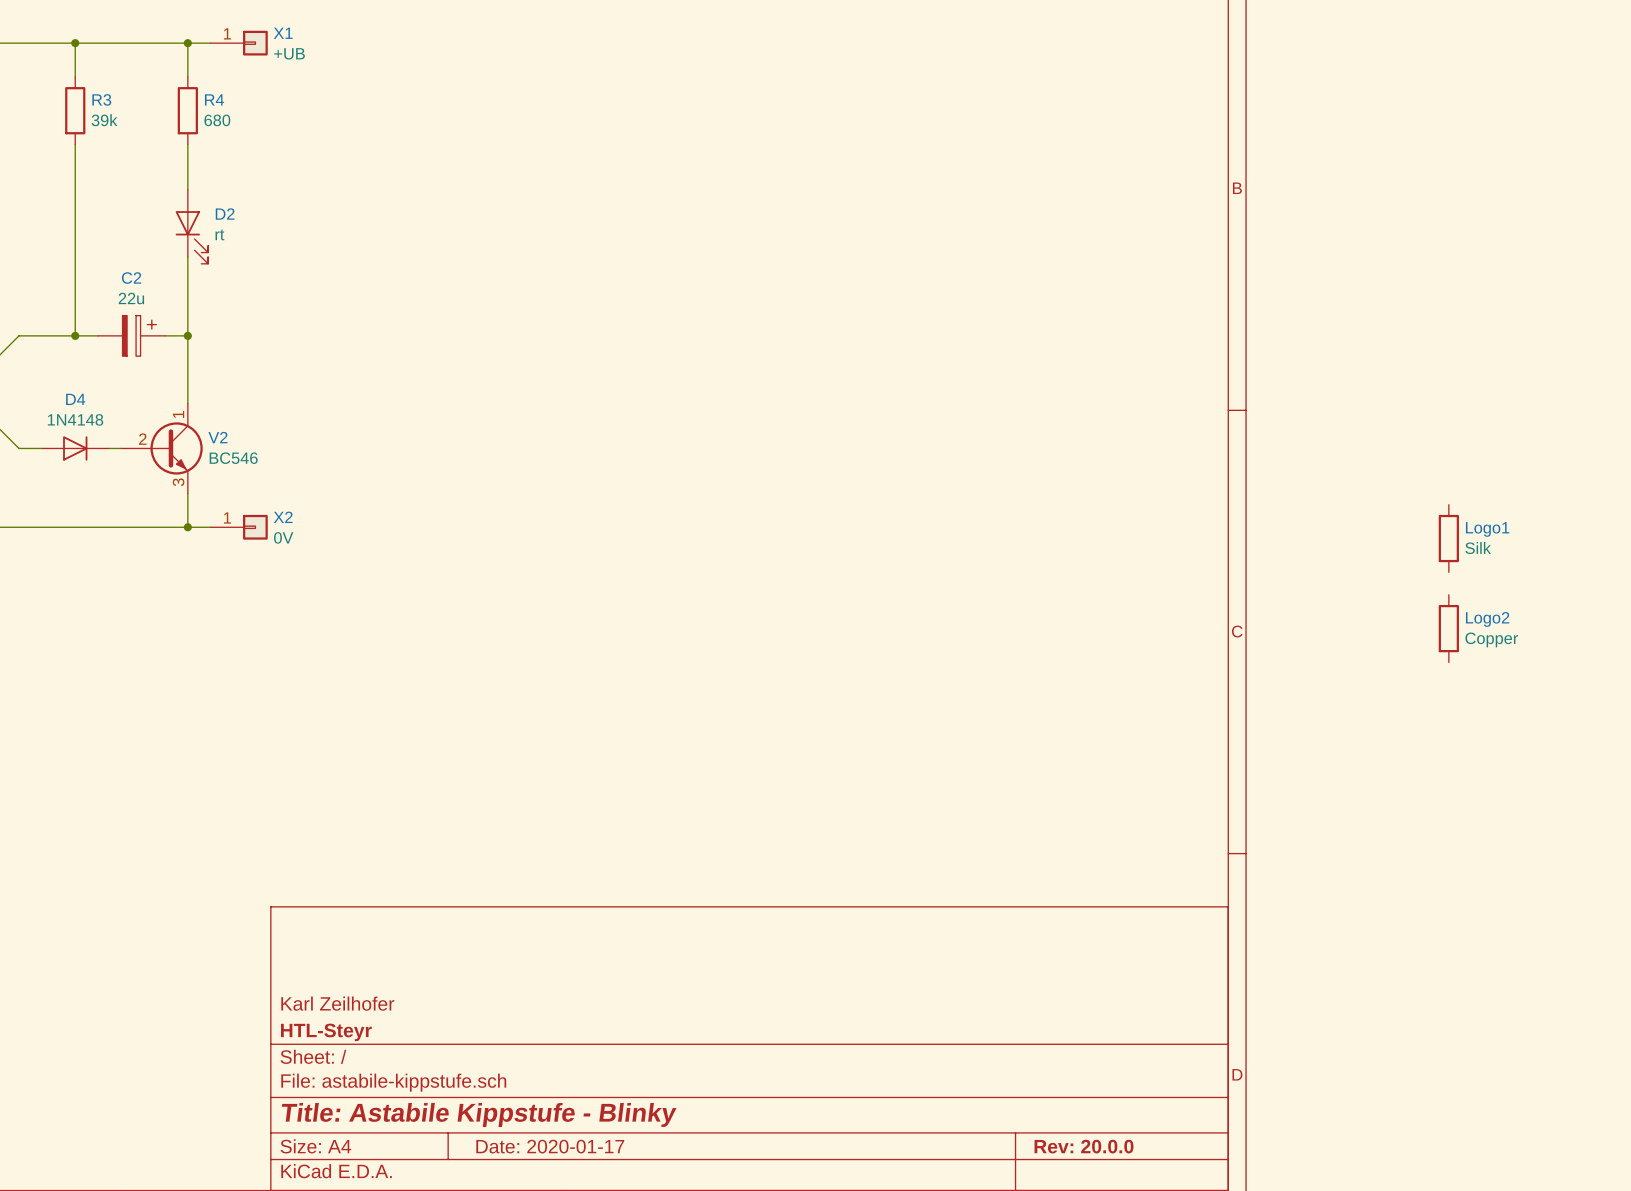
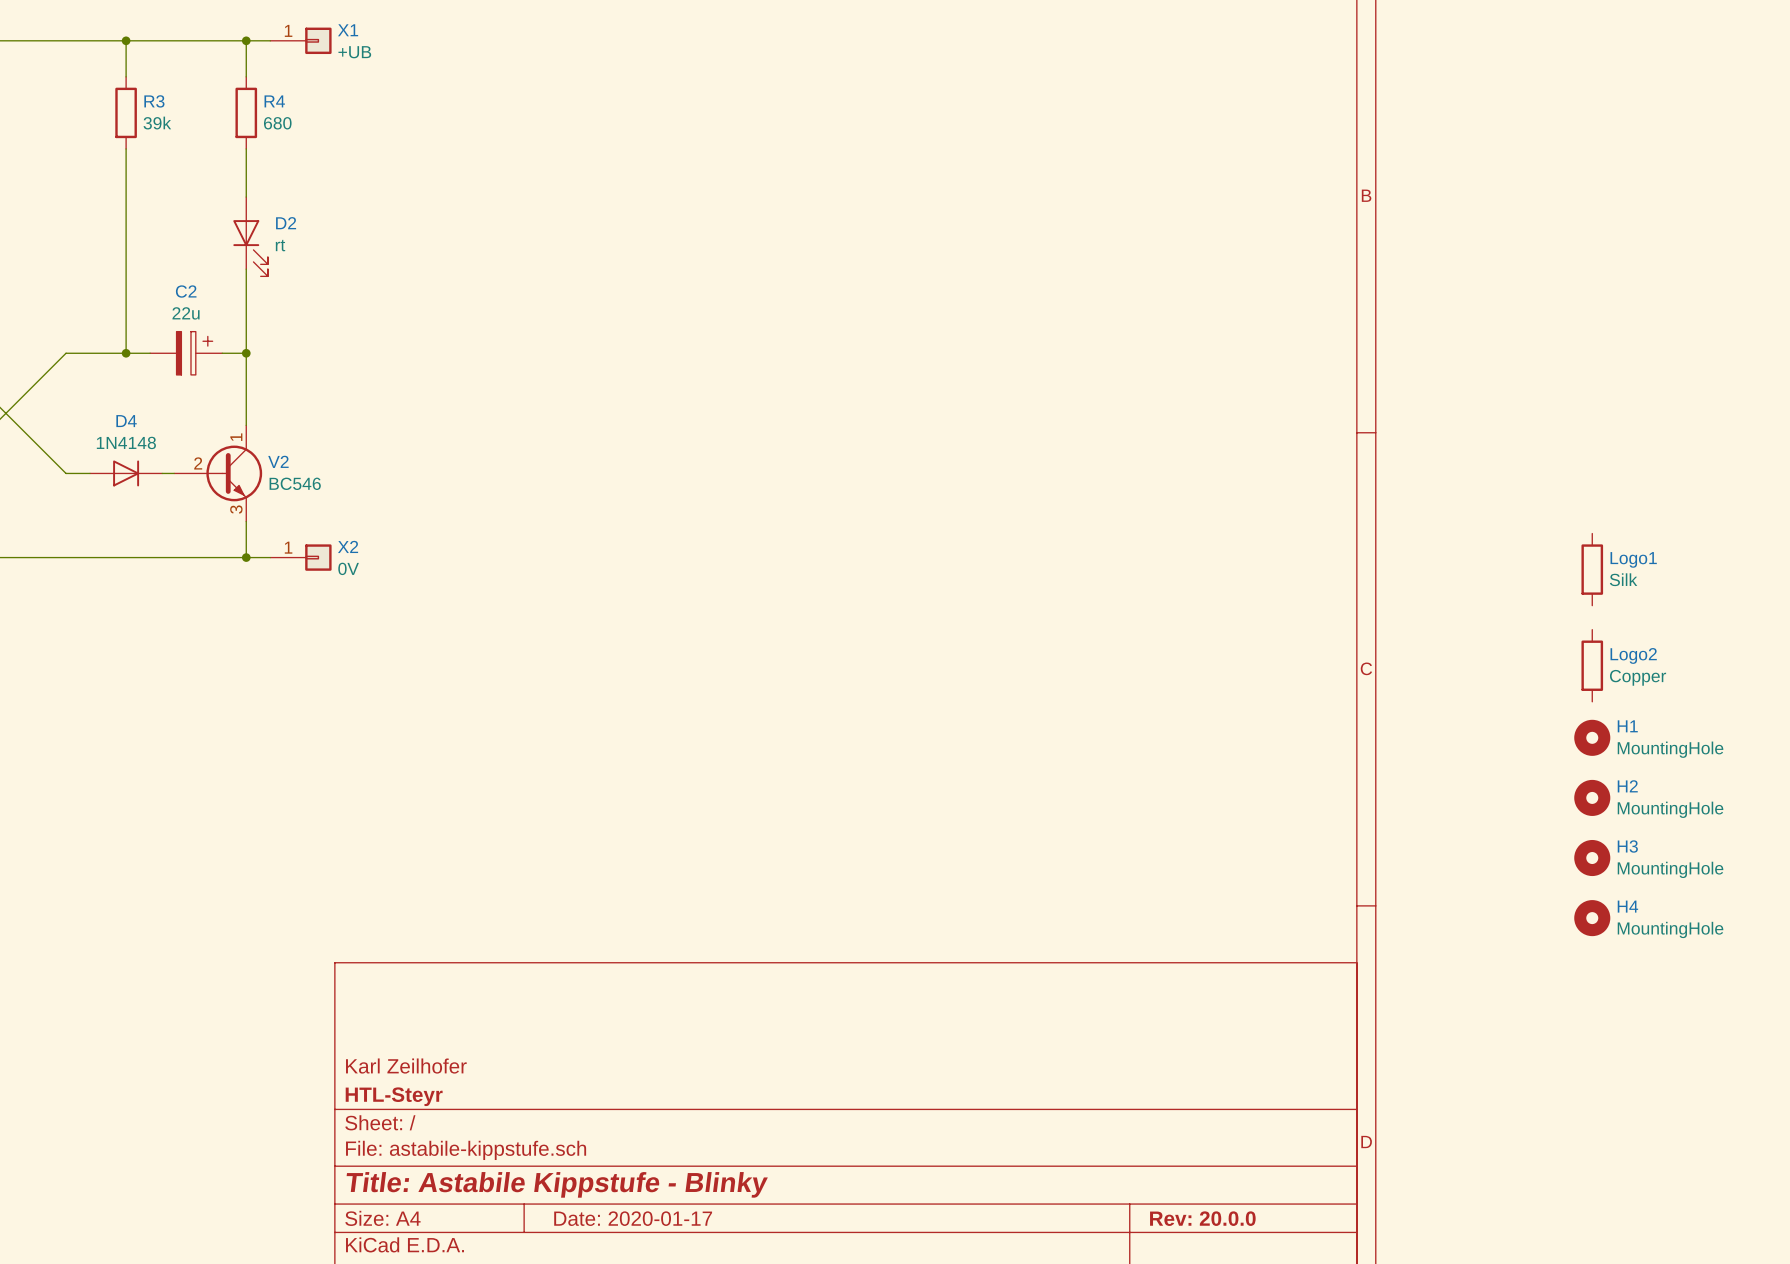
H1: none -> MountingHole (1592, 737)
H2: none -> MountingHole (1592, 797)
H3: none -> MountingHole (1592, 858)
H4: none -> MountingHole (1592, 918)

